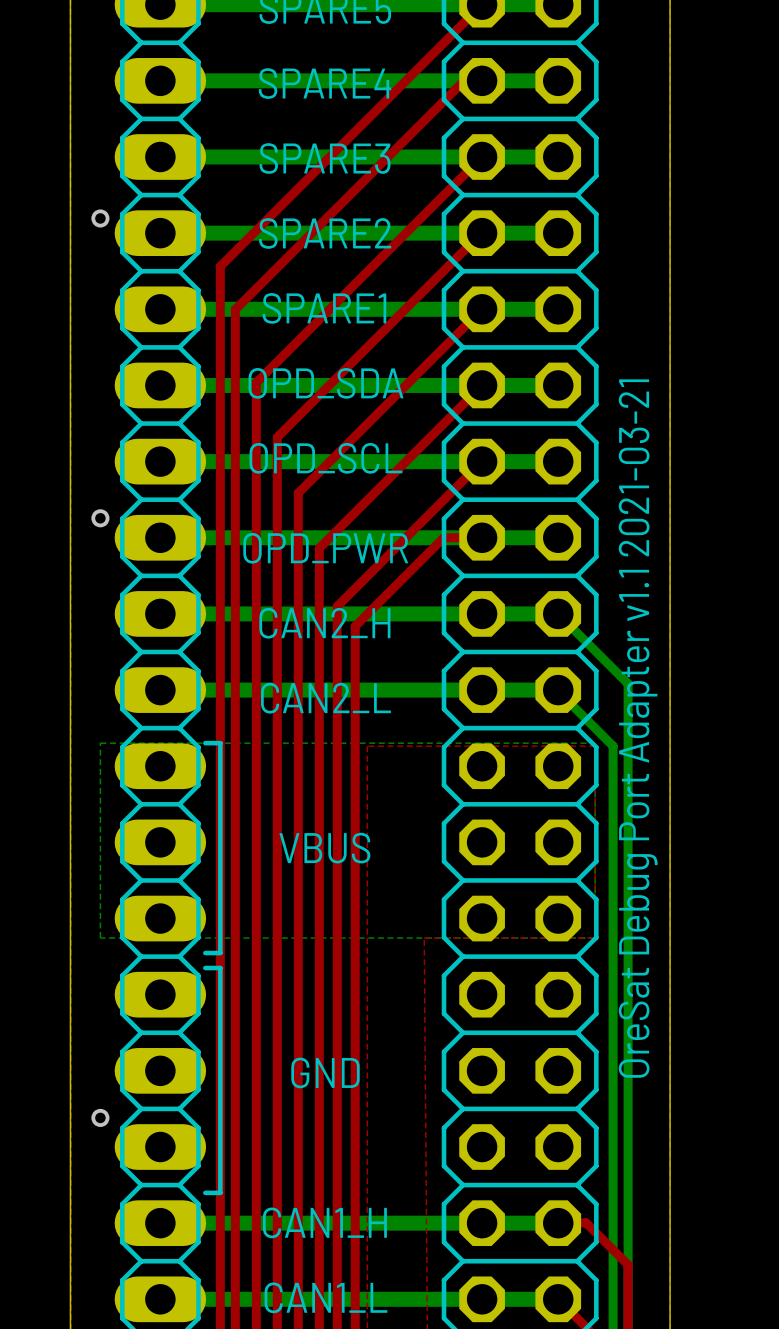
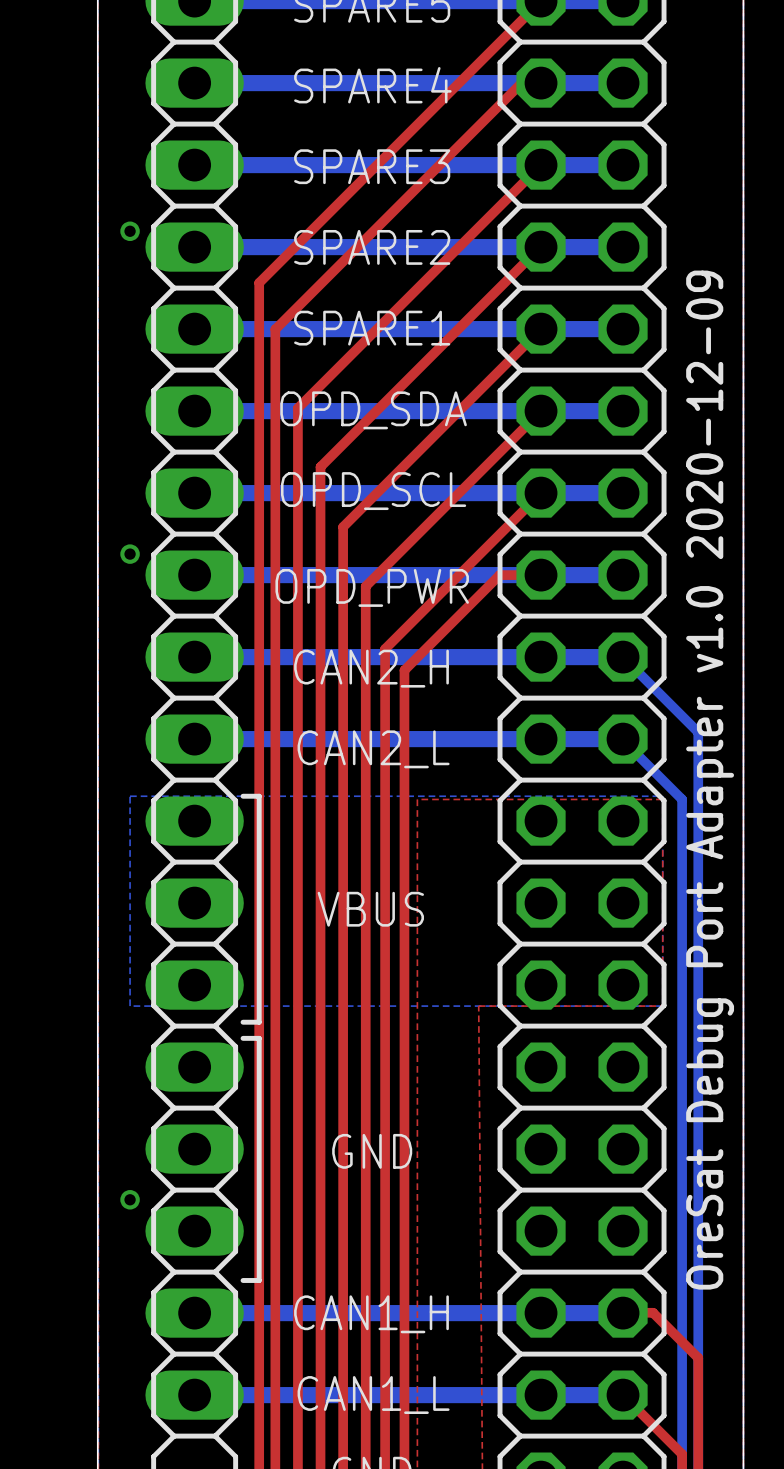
text: OreSat Debug Port Adapter v1.1 2021-03-21 (638, 728) -> OreSat Debug Port Adapter v1.0 2020-12-09 (710, 780)

